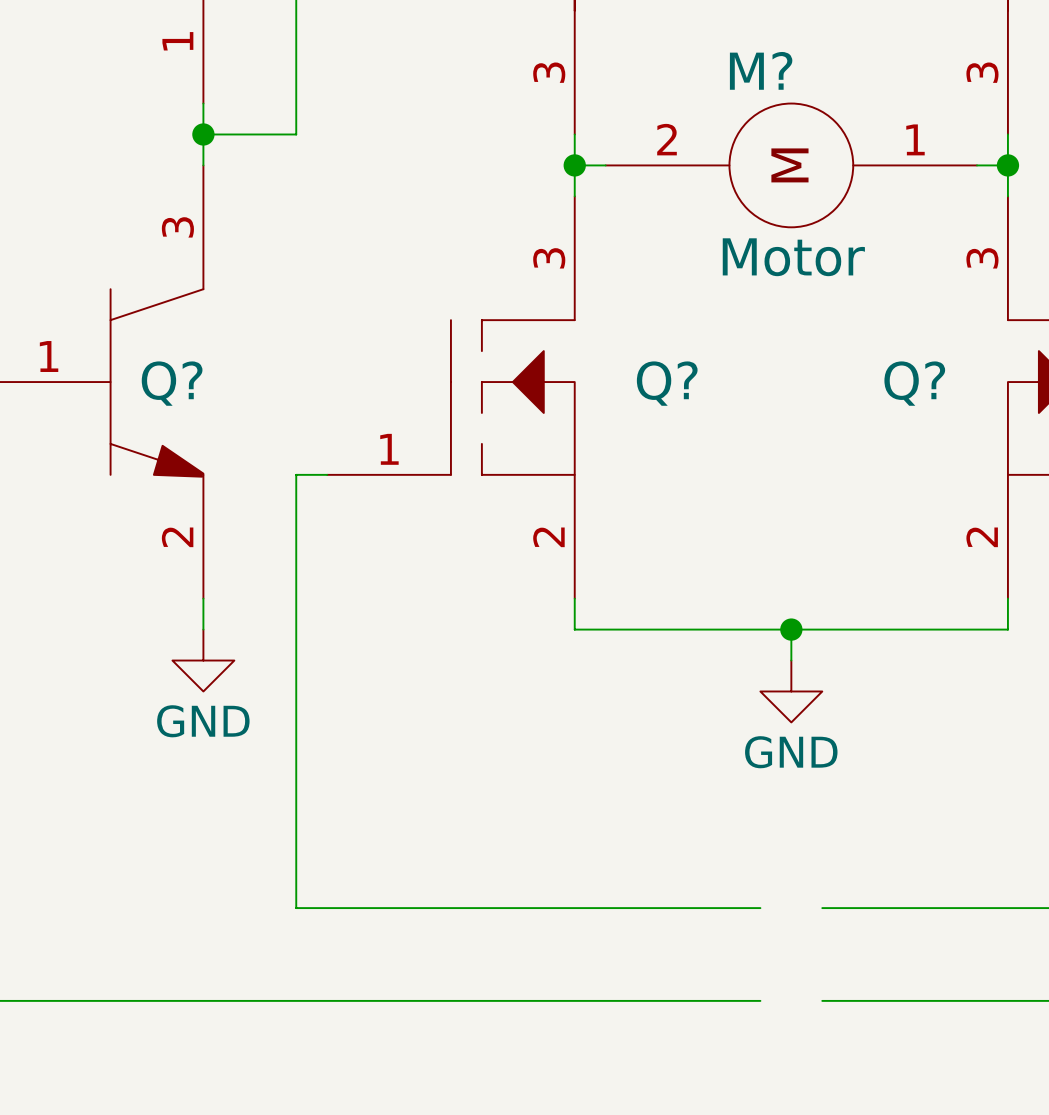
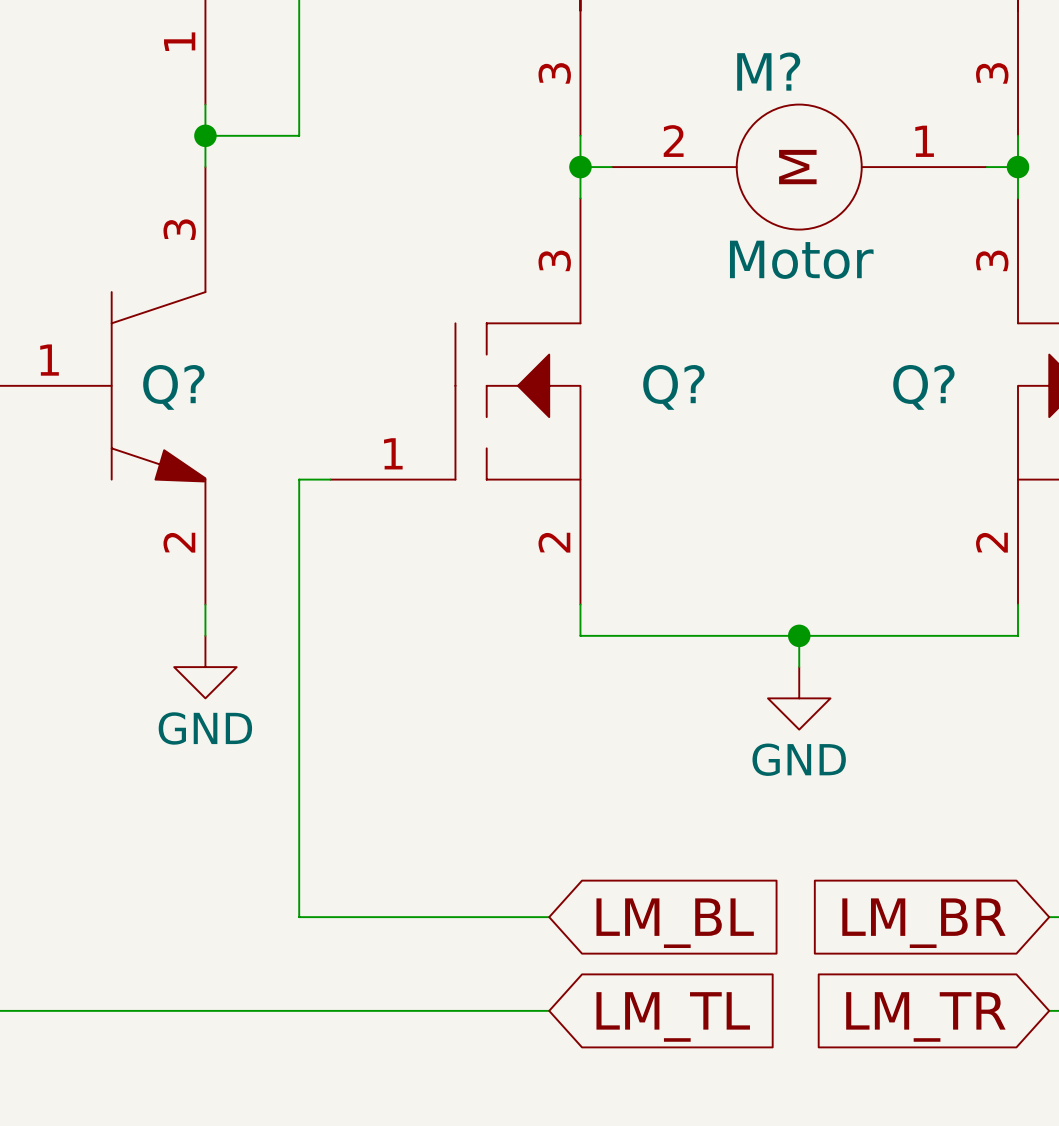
wire: (543, 908) (760, 908) -> none
wire: (822, 908) (1038, 908) -> none
global label: none -> LM_BL (675, 923)
global label: none -> LM_BR (923, 923)
wire: (543, 1000) (760, 1000) -> none
wire: (822, 1000) (1038, 1000) -> none
global label: none -> LM_TL (673, 1016)
global label: none -> LM_TR (925, 1016)

